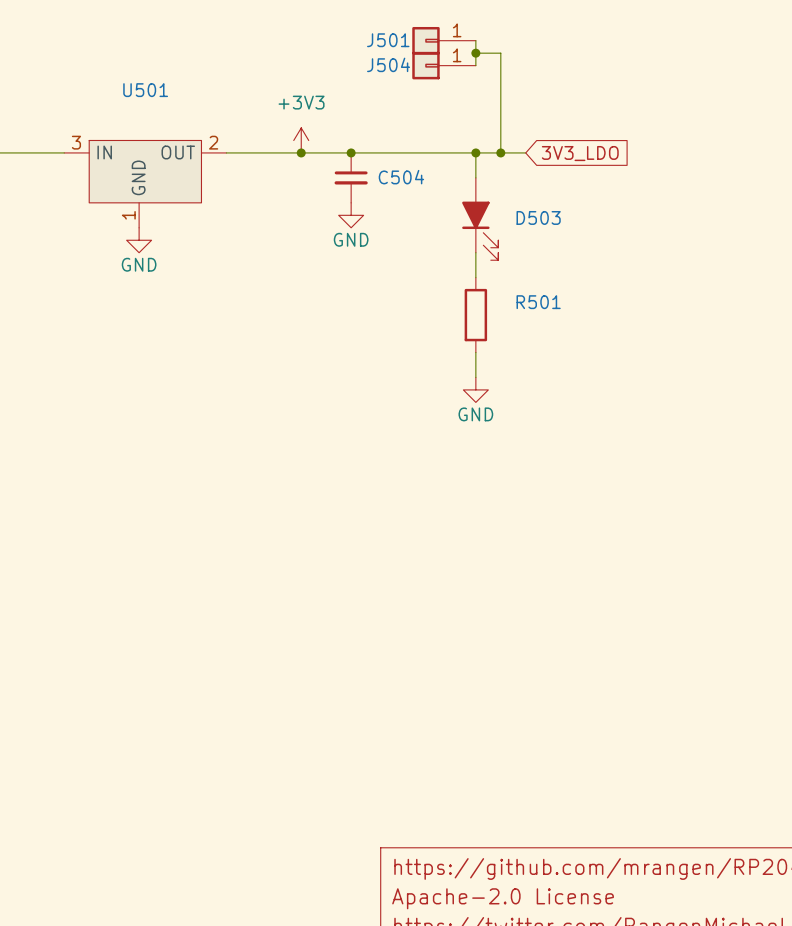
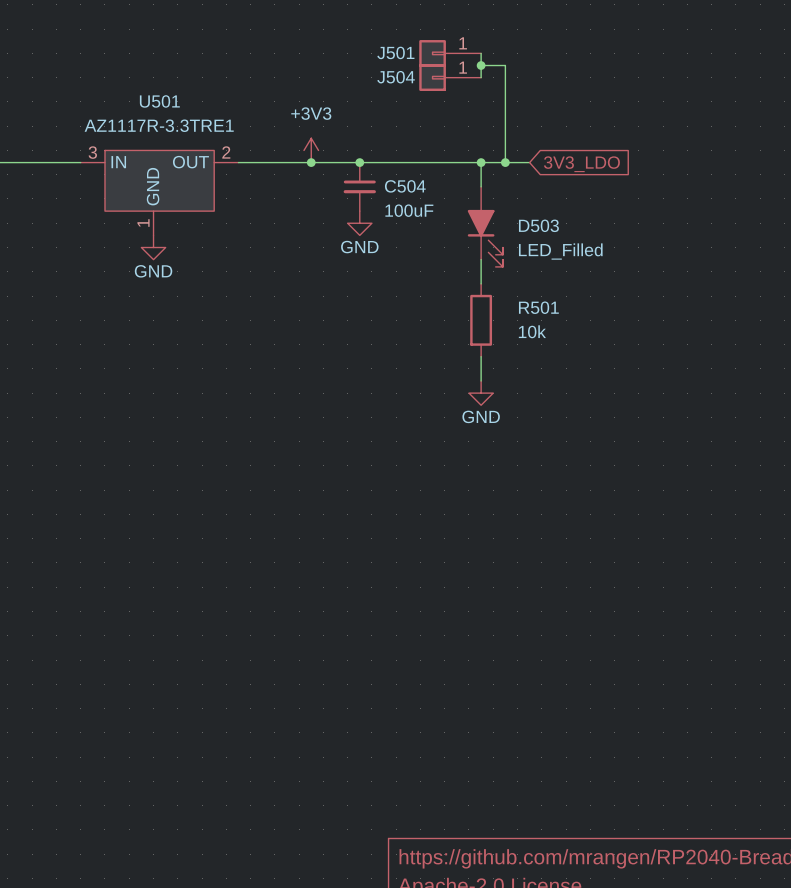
U501 value: none -> AZ1117R-3.3TRE1 (159, 125)
C504 value: none -> 100uF (409, 210)
D503 value: none -> LED_Filled (560, 251)
R501 value: none -> 10k (532, 331)

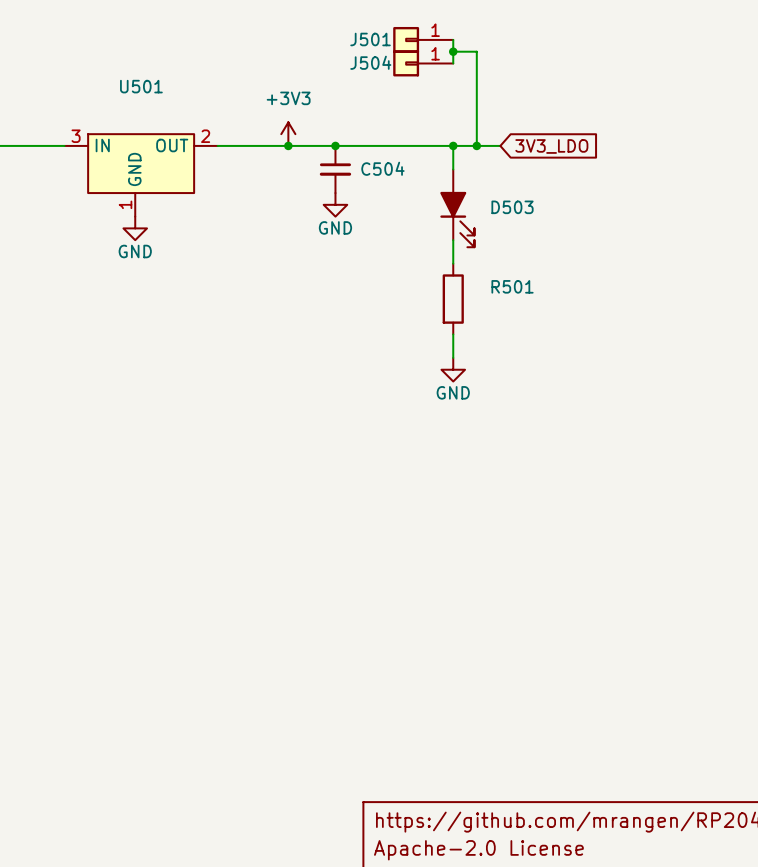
U501 value: AZ1117R-3.3TRE1 (159, 125) -> none
C504 value: 100uF (409, 210) -> none
D503 value: LED_Filled (560, 251) -> none
R501 value: 10k (532, 331) -> none

